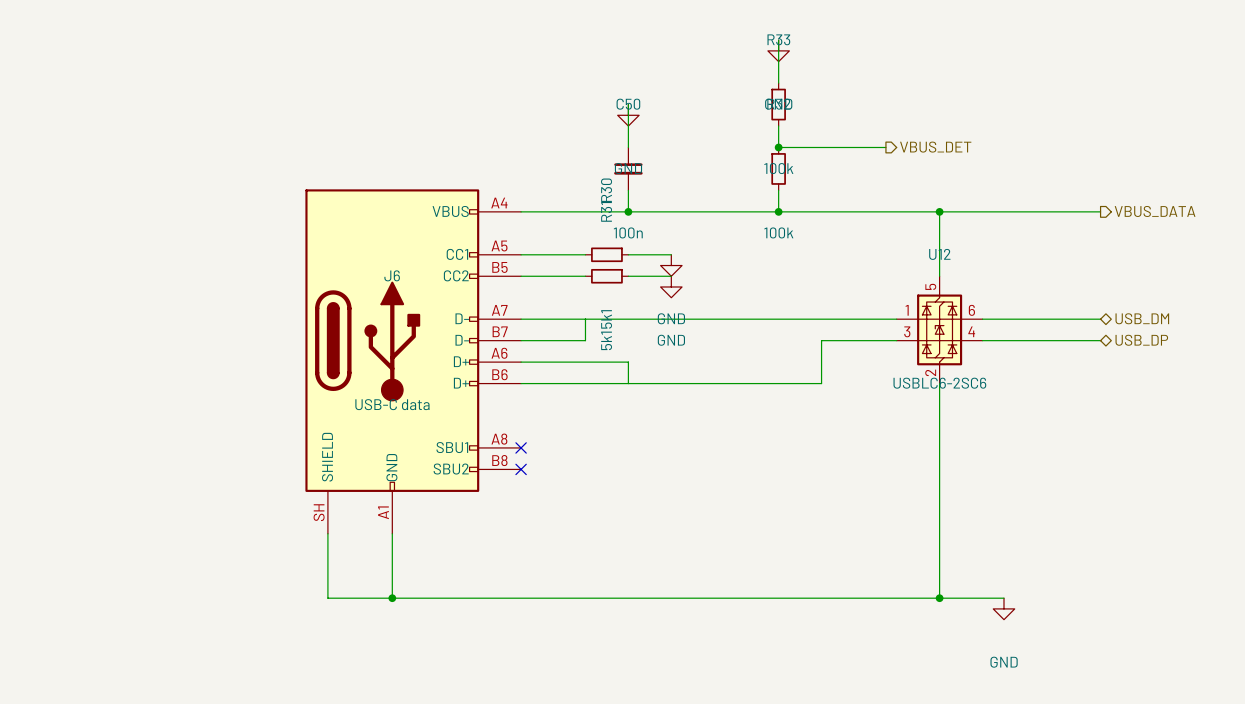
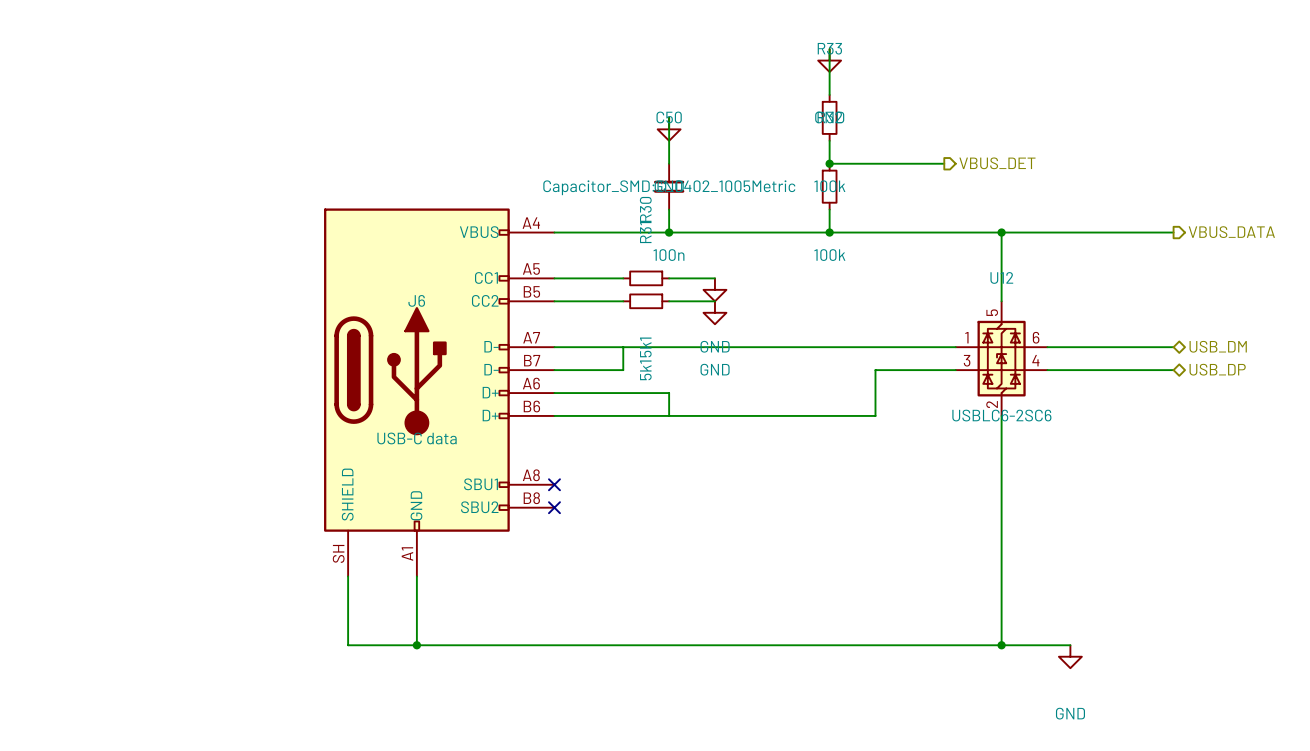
C50 text: none -> Capacitor_SMD:C_0402_1005Metric (669, 187)

